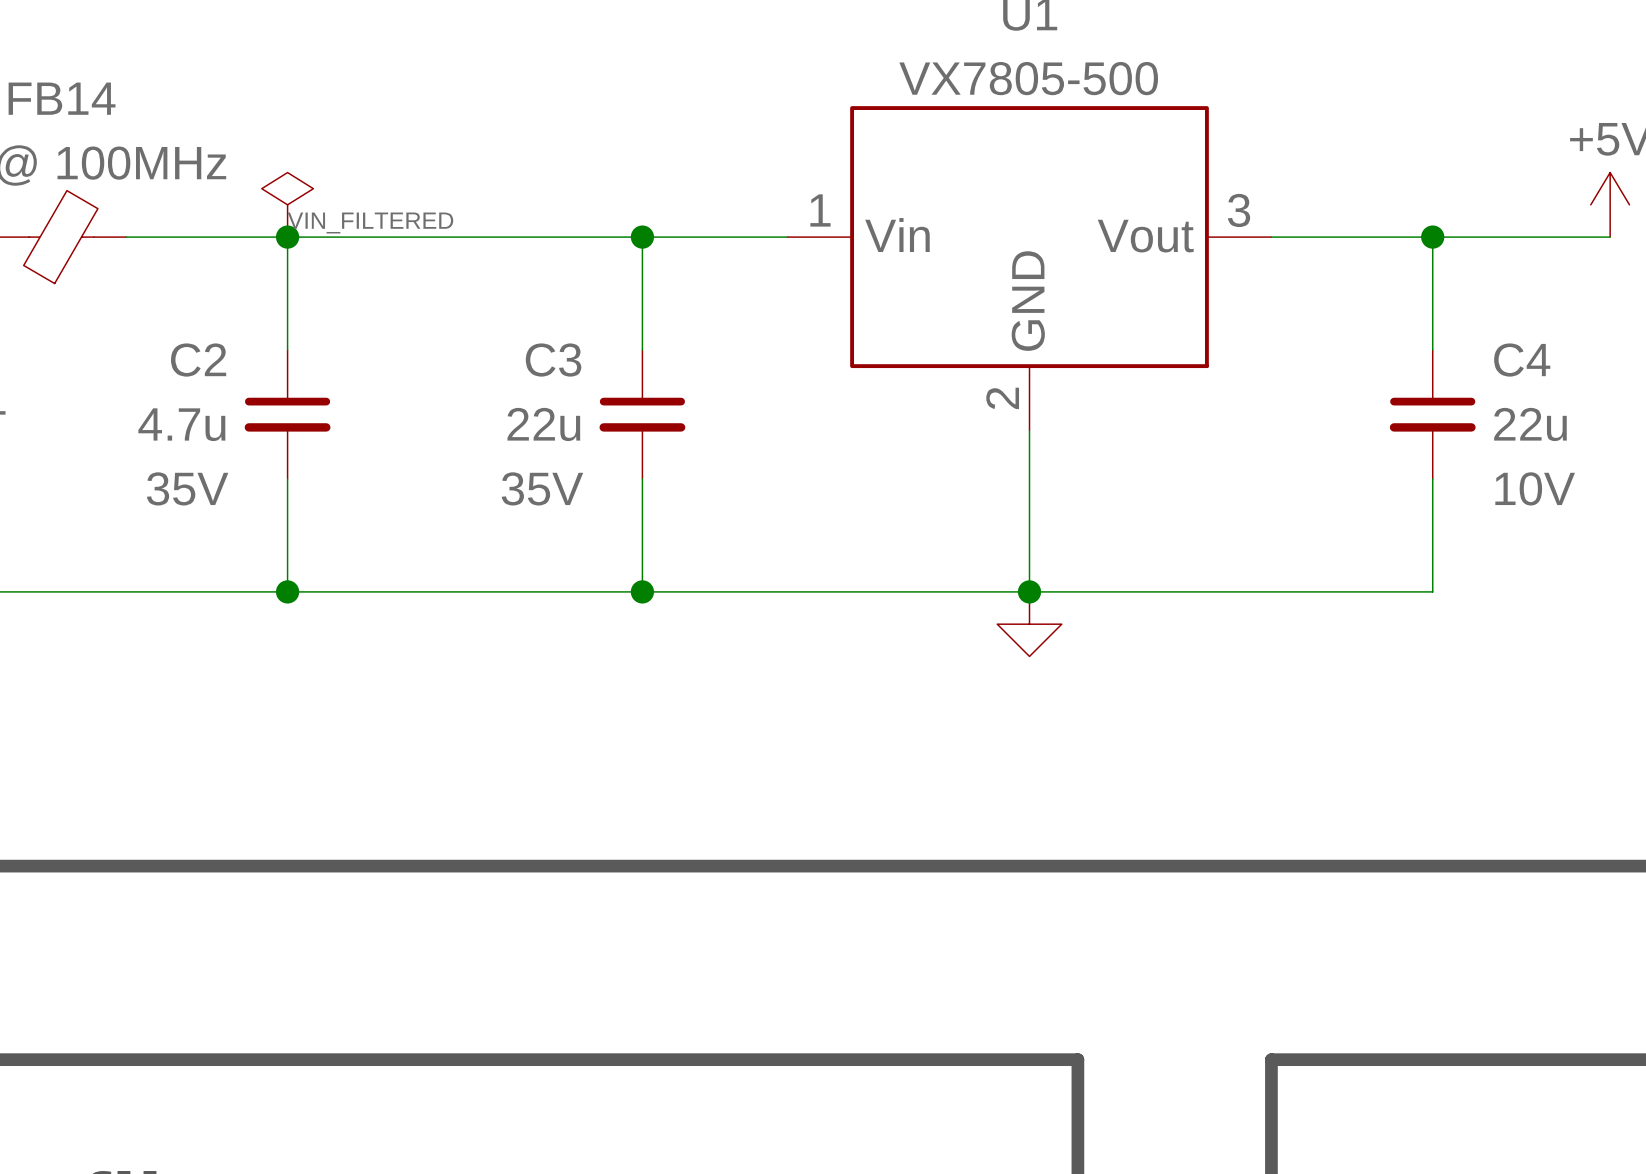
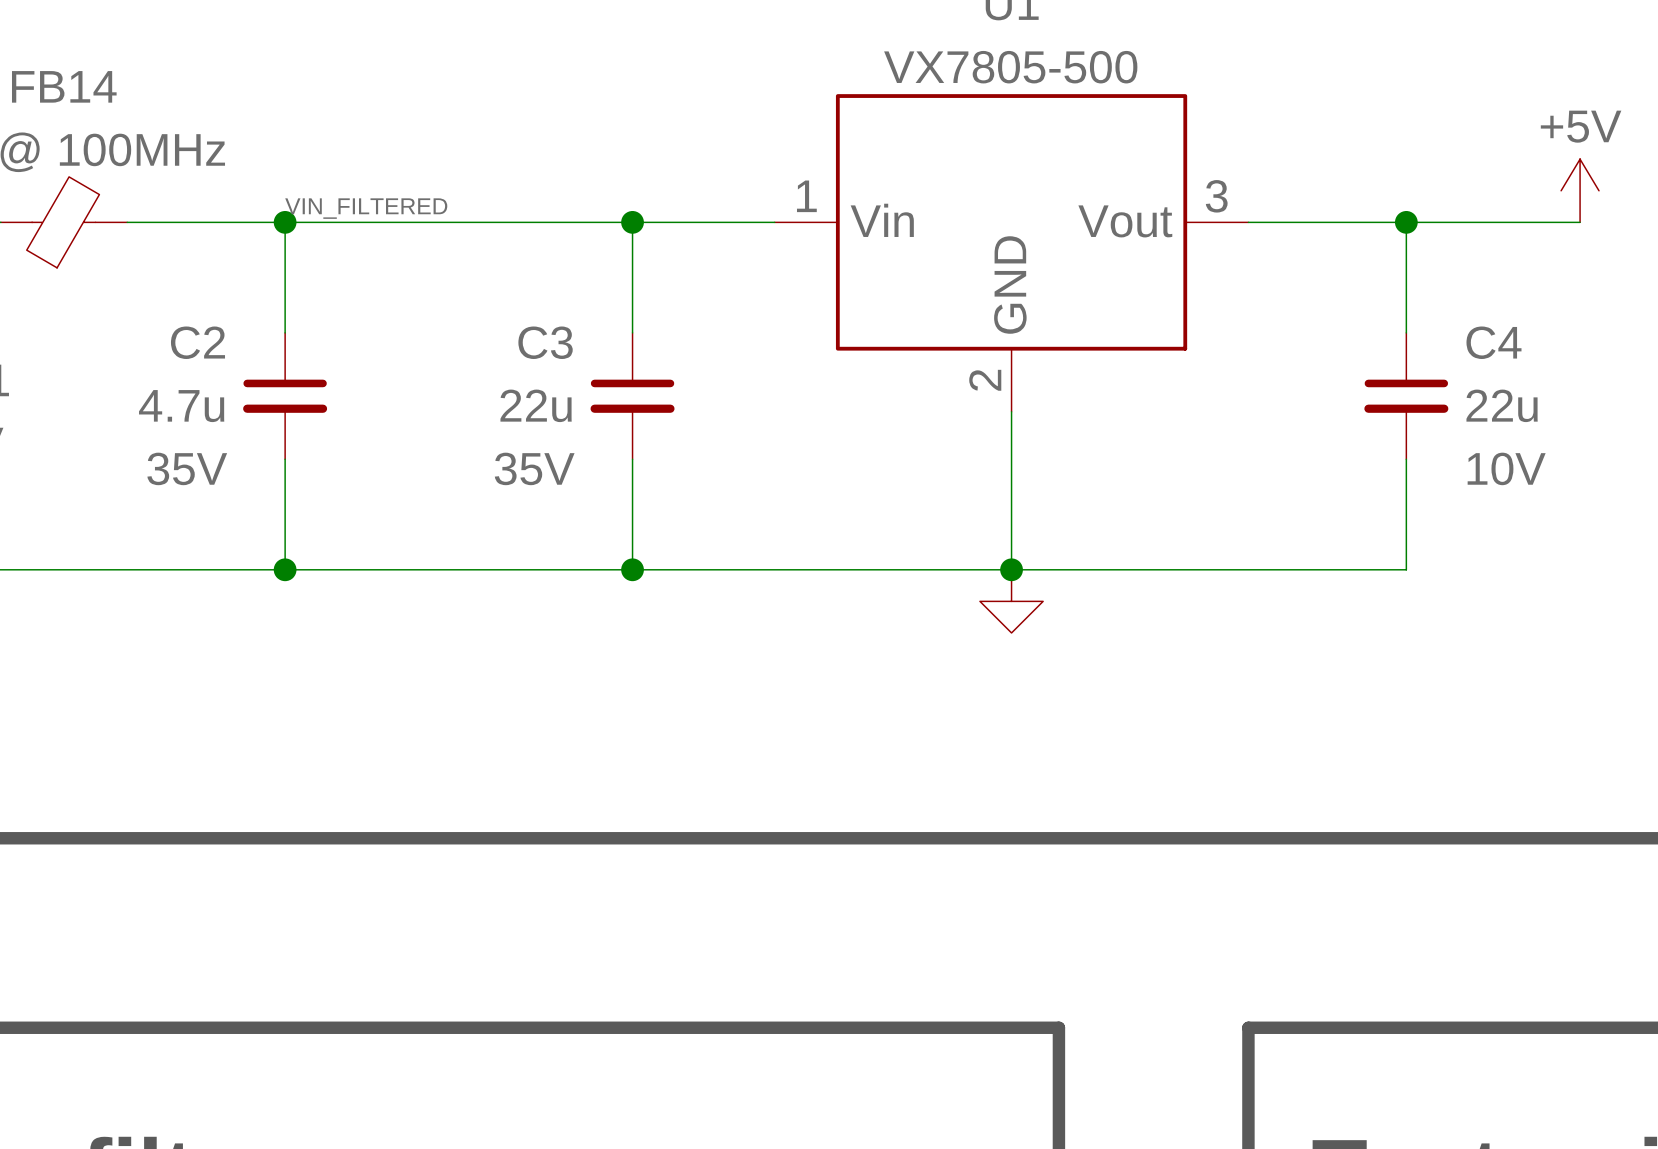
power symbol: (287, 204) -> none

